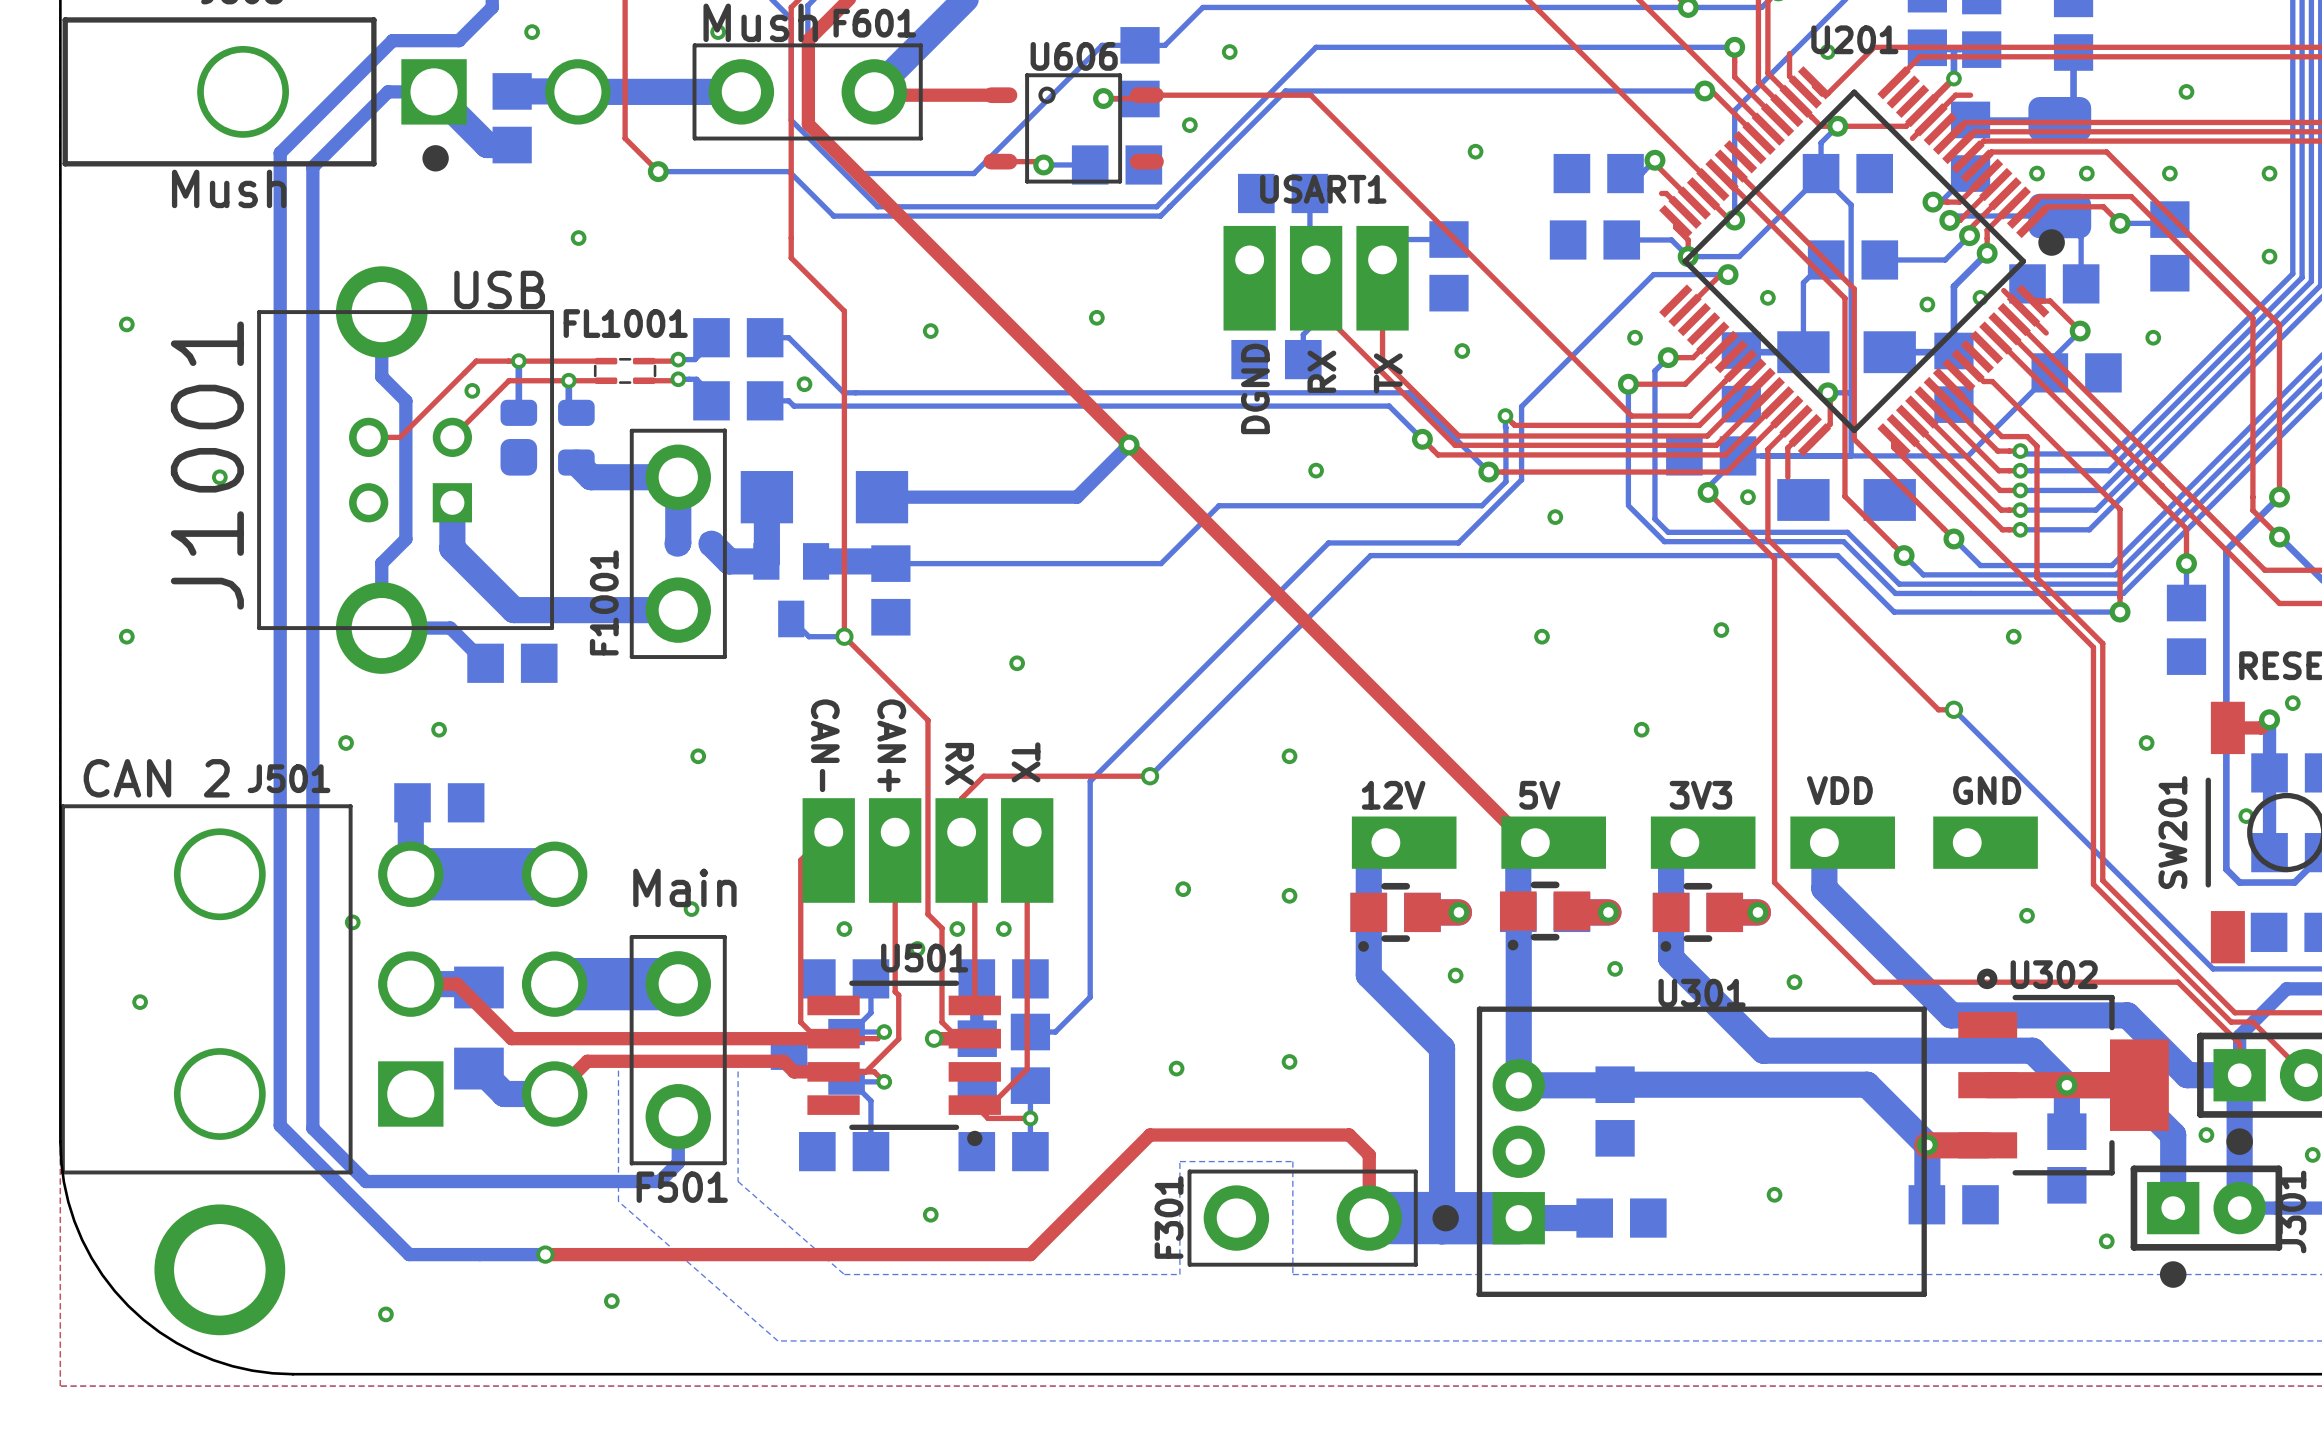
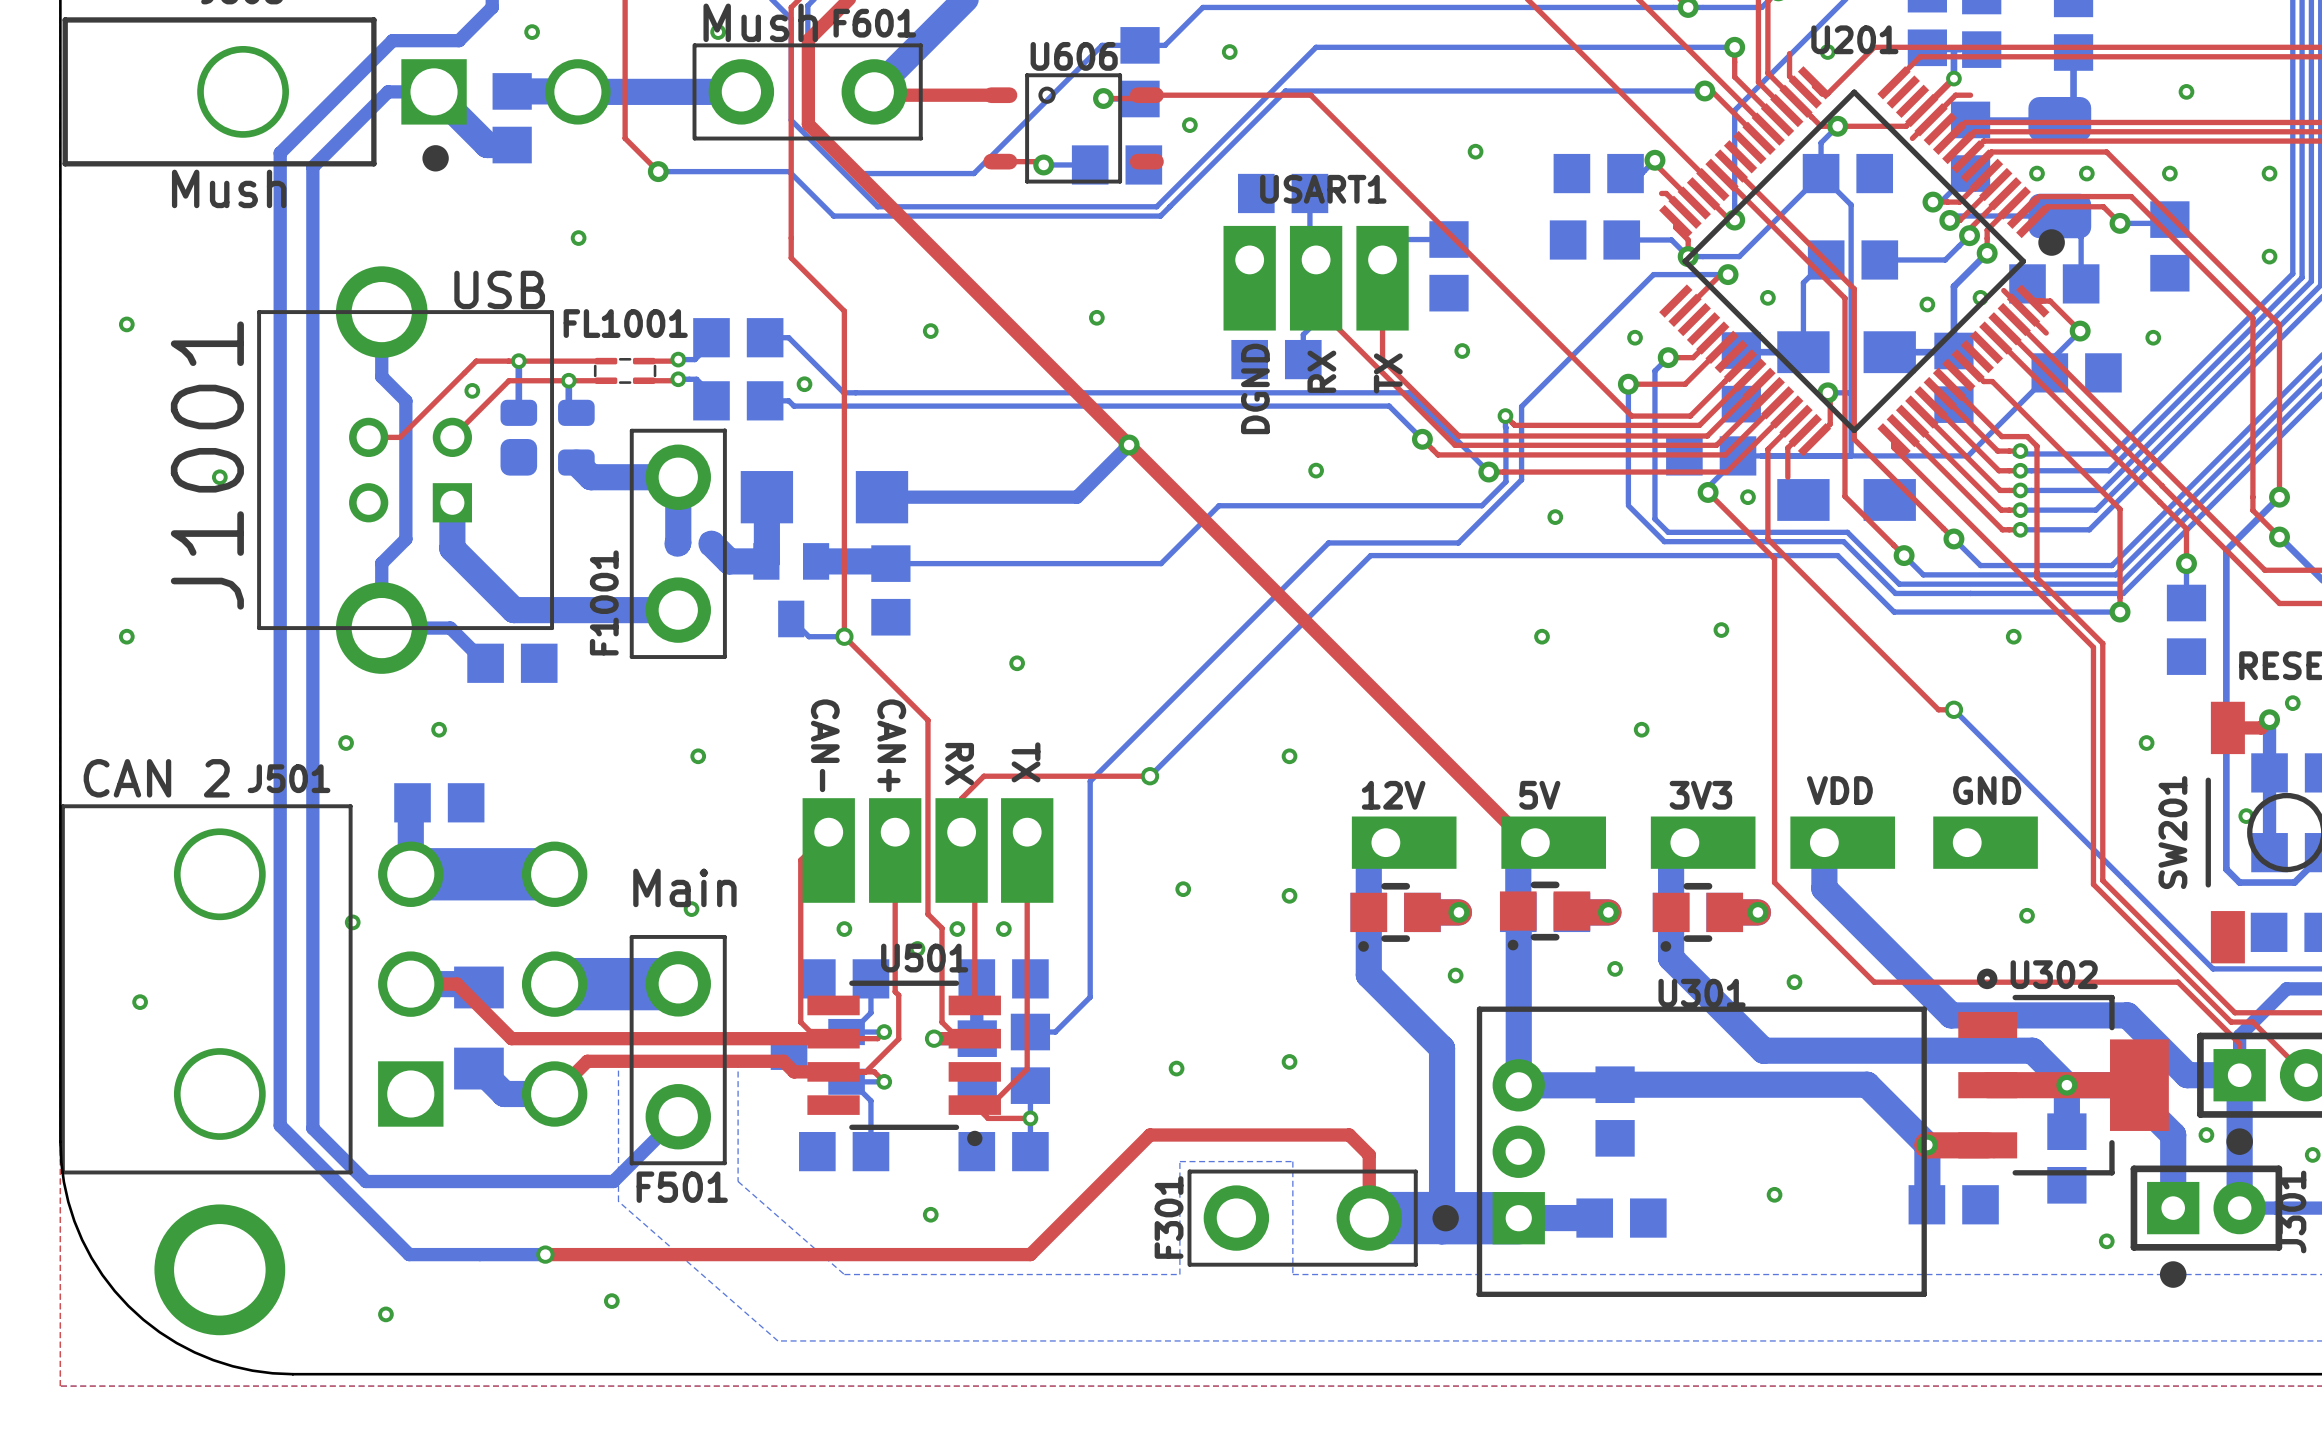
bottom track: (678, 1116) (678, 1162) (659, 1181) (613, 1181) -> (678, 1116) (613, 1181)

